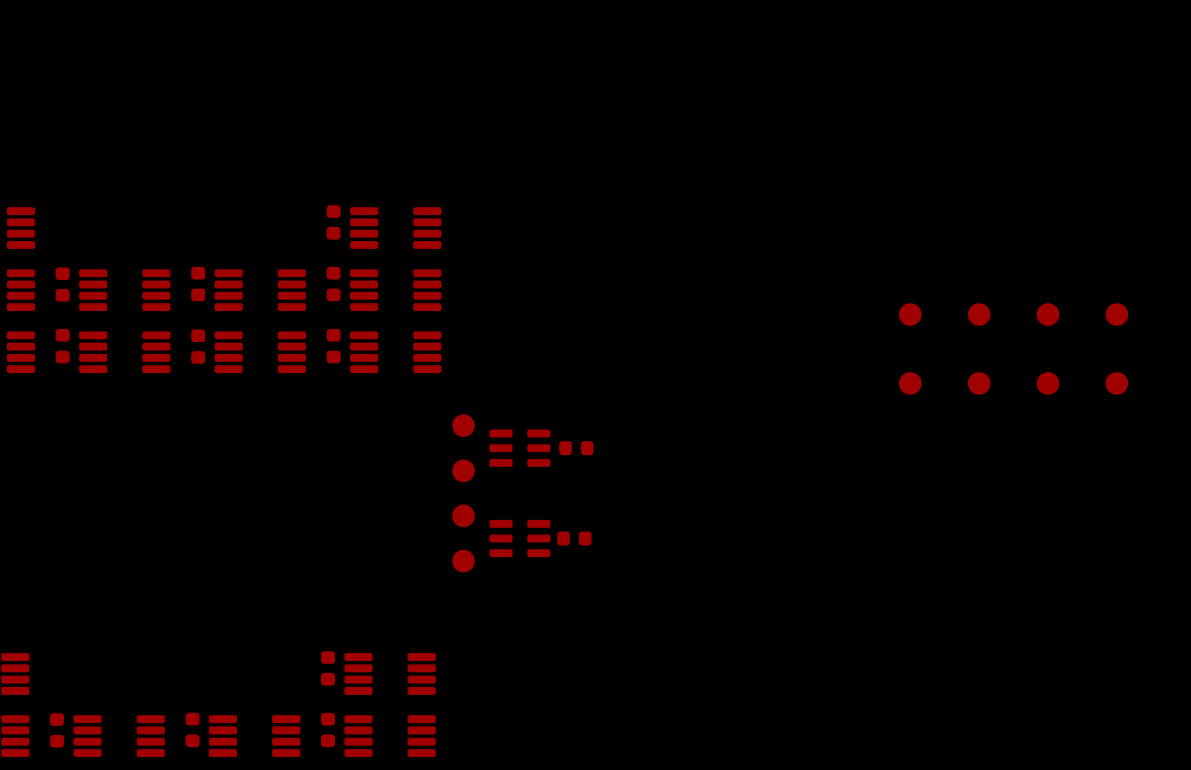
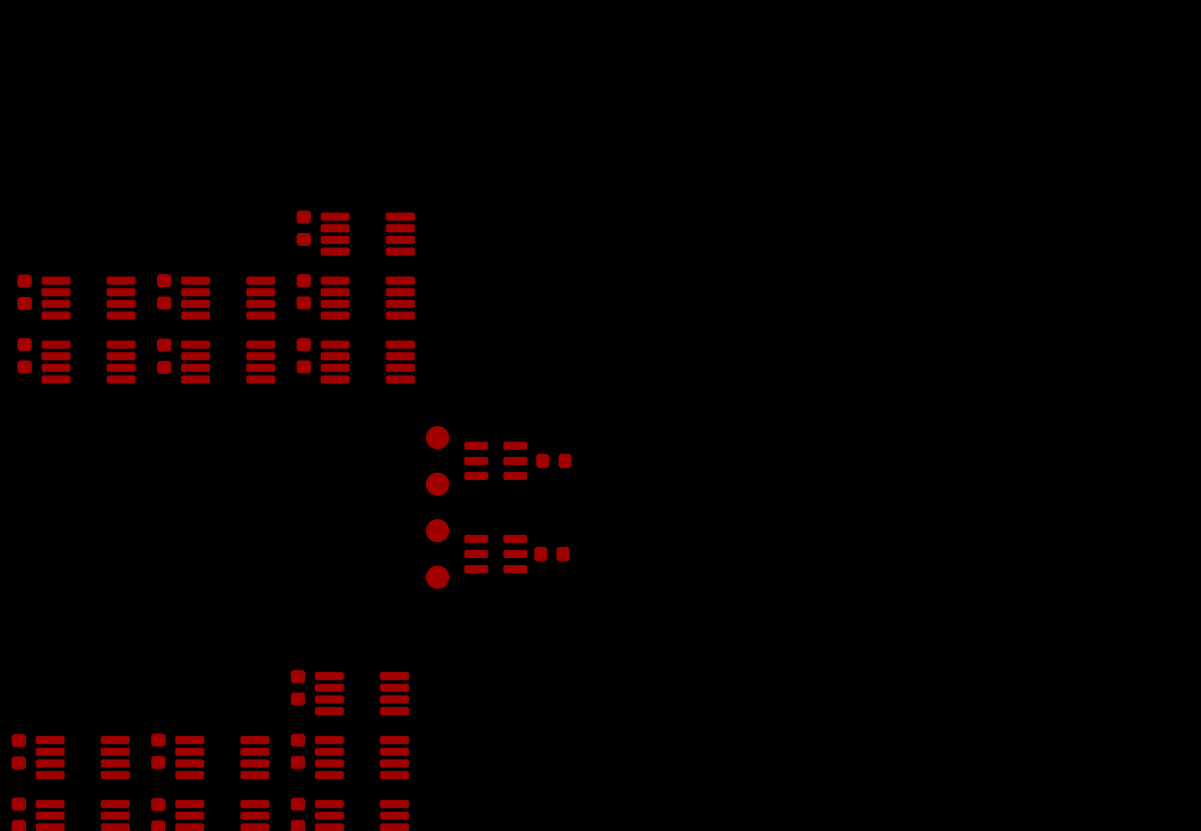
part: (910, 314) -> none
part: (979, 314) -> none
part: (1048, 314) -> none
part: (1116, 314) -> none
part: (910, 383) -> none
part: (979, 383) -> none
part: (1048, 383) -> none
part: (1116, 383) -> none

